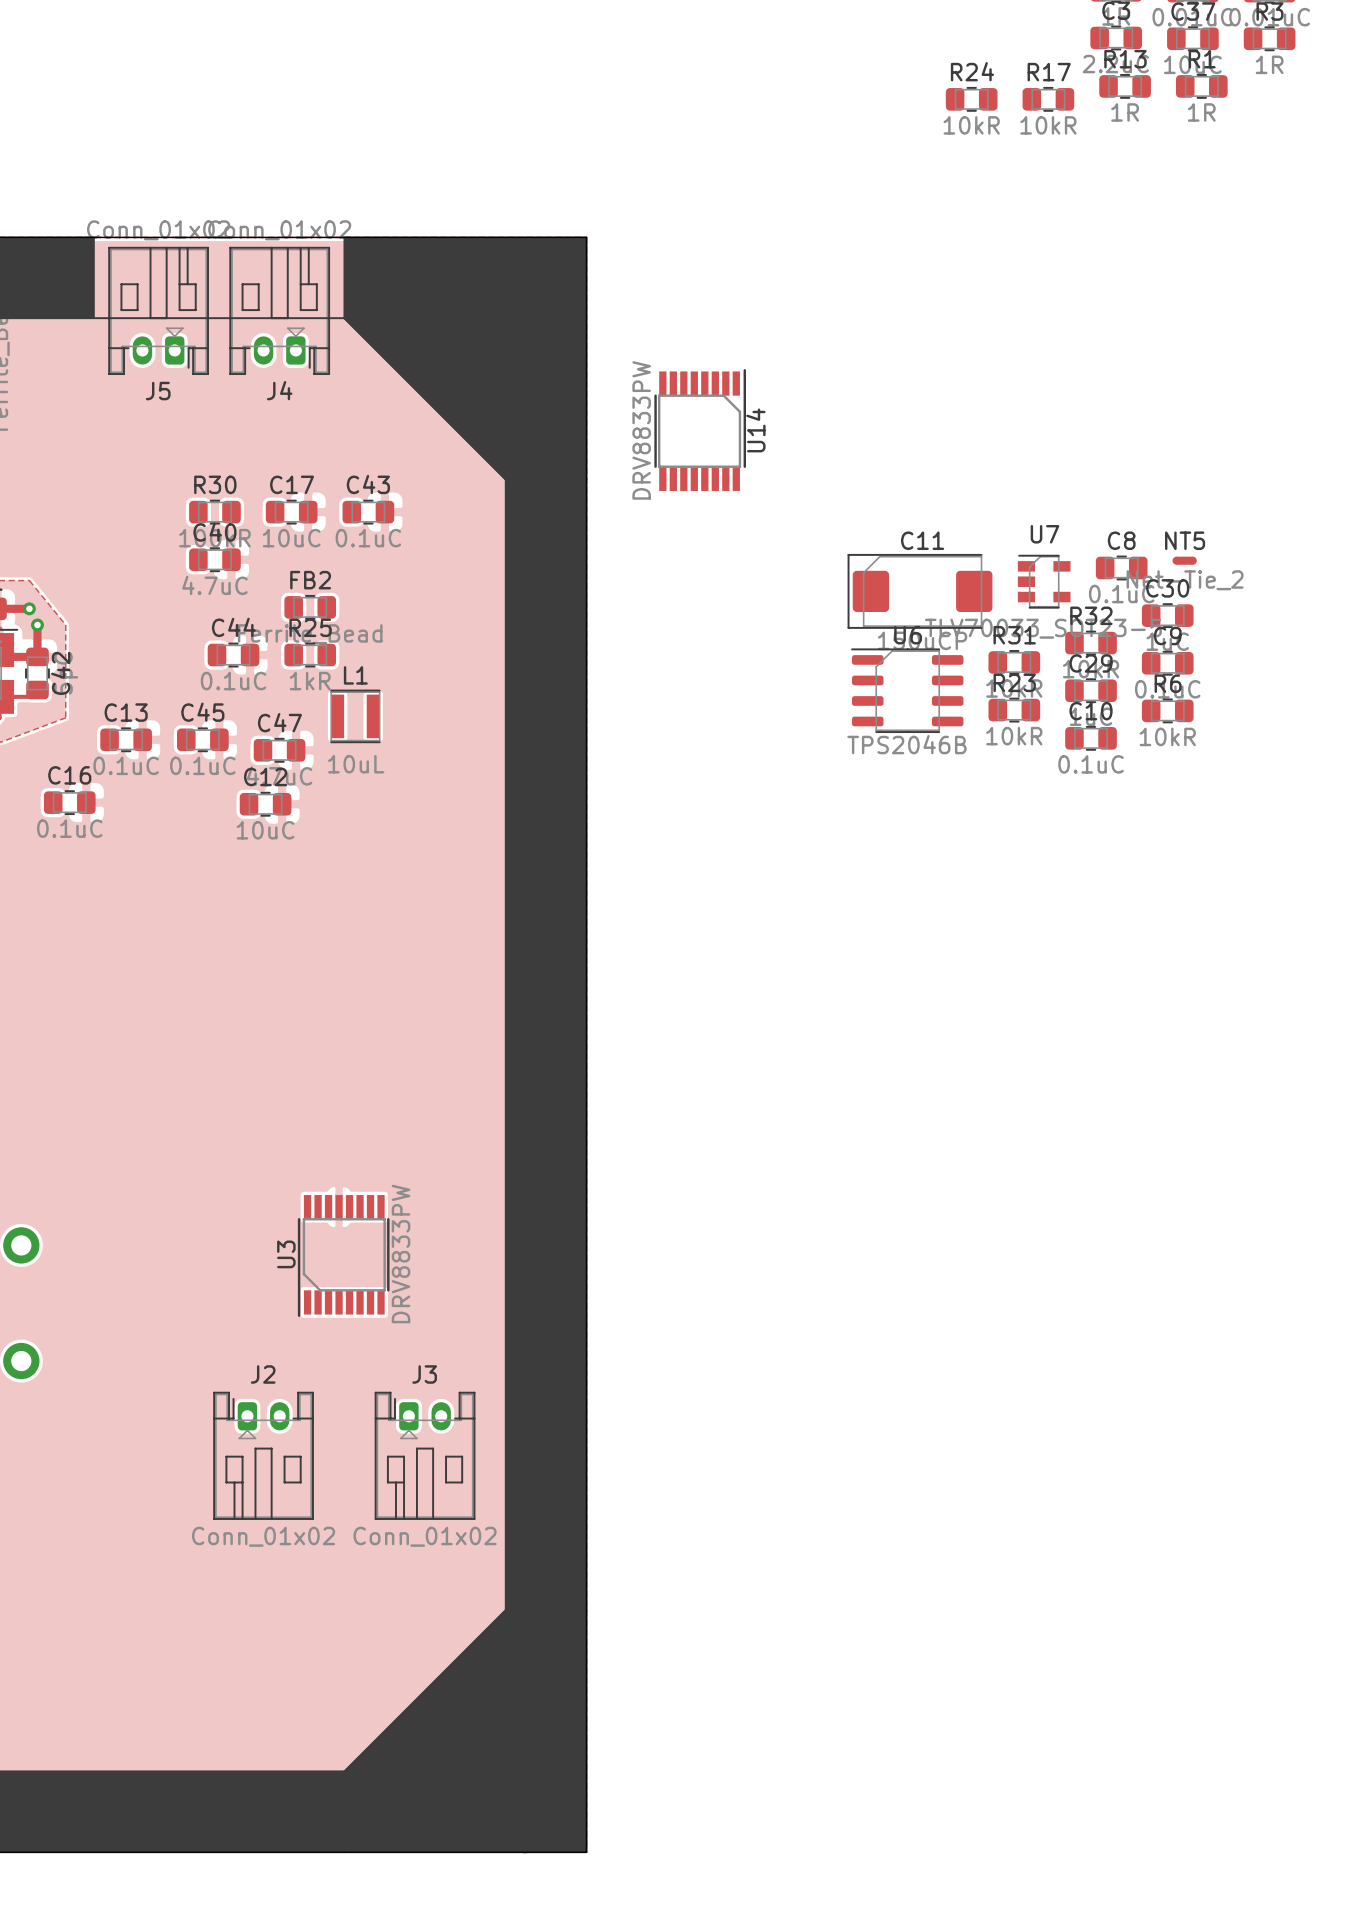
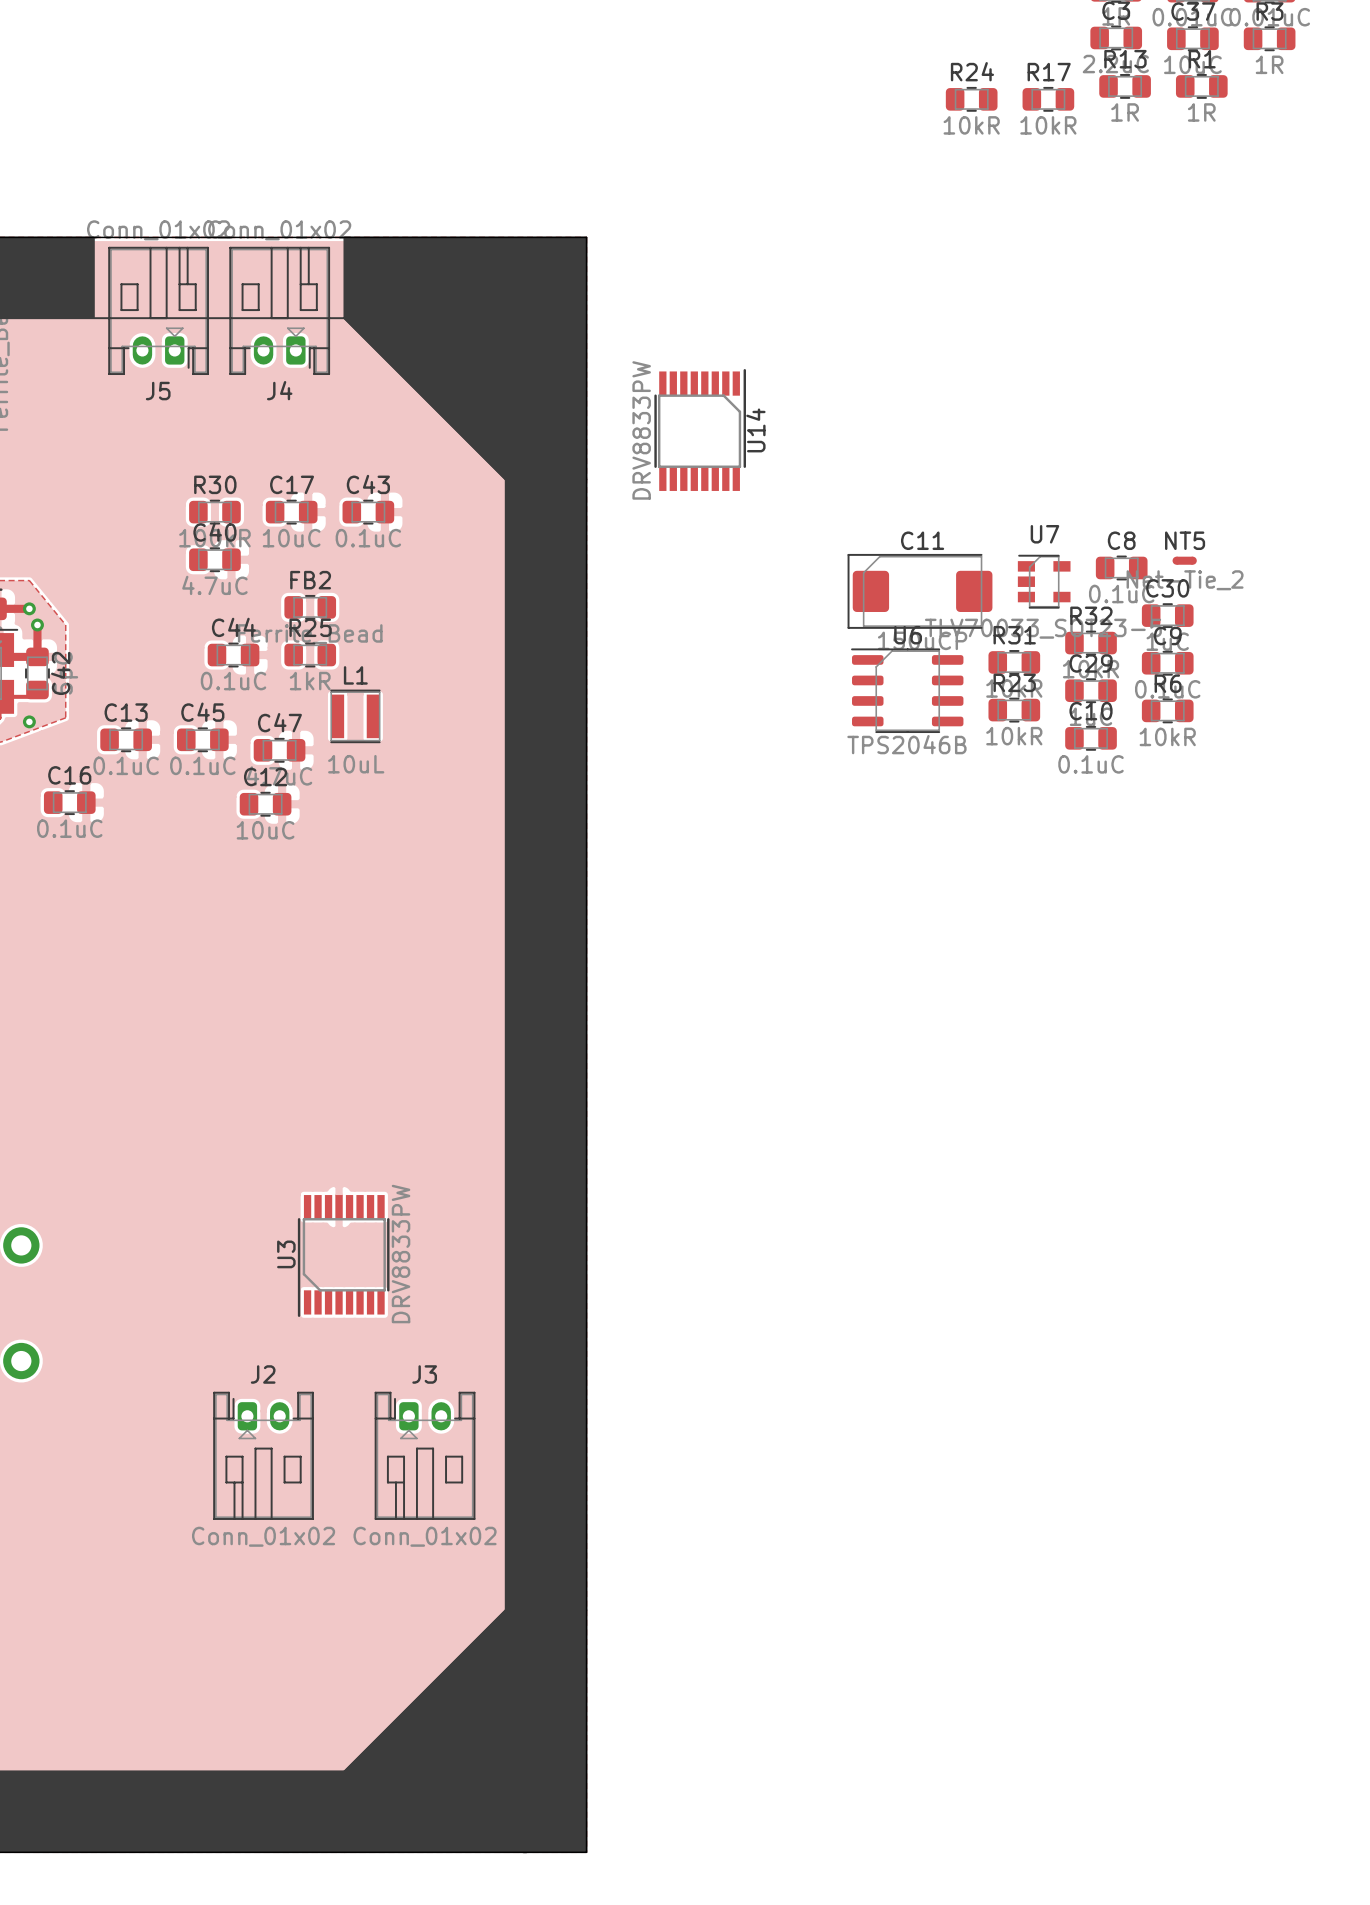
via: none -> (29, 721)

